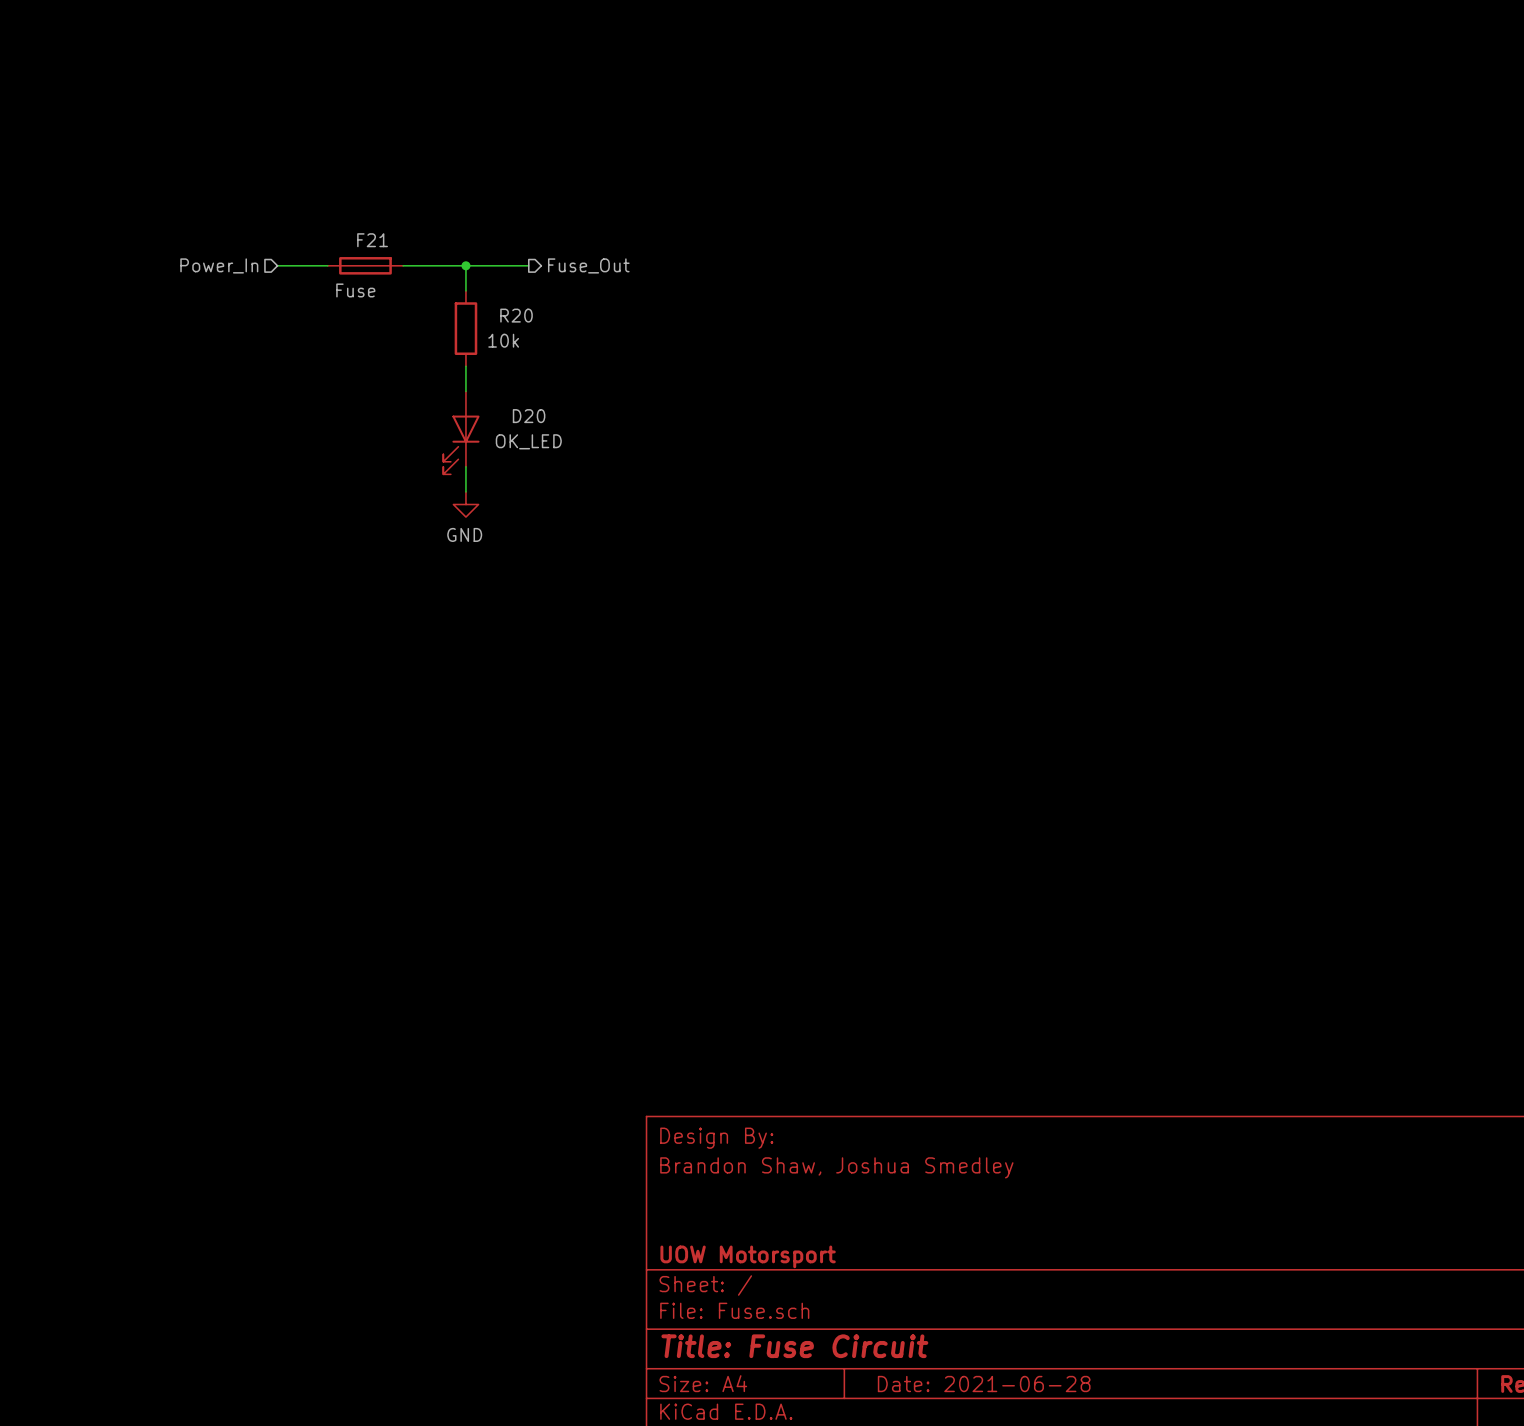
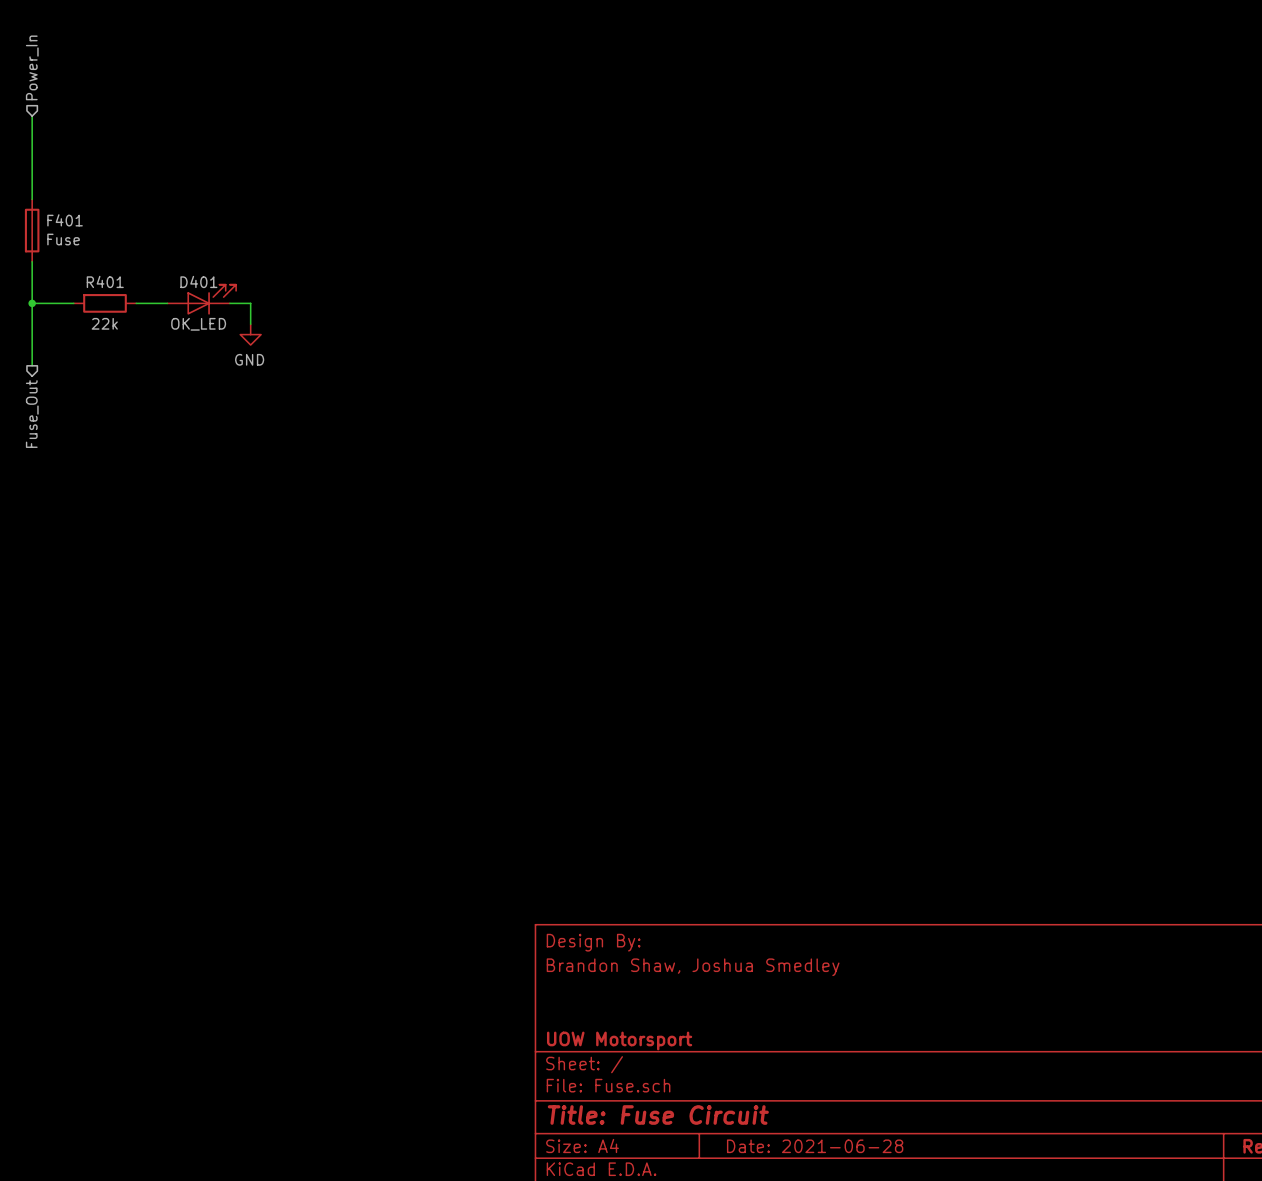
hierarchical label: none -> Power_In (32, 67)
wire: none -> (32, 116) (32, 199)
hierarchical label: Power_In (219, 265) -> none
wire: (277, 265) (327, 265) -> none
F21: Fuse (365, 265) -> none
wire: (403, 265) (528, 265) -> none
wire: (465, 265) (465, 290) -> none
junction: (465, 265) -> none
hierarchical label: Fuse_Out (588, 265) -> none
F401: none -> Fuse (32, 230)
wire: none -> (32, 261) (32, 365)
R20: 10k (465, 328) -> none
D401: none -> OK_LED (201, 299)
wire: none -> (32, 303) (73, 303)
junction: none -> (32, 303)
R401: none -> 22k (105, 303)
wire: none -> (136, 303) (167, 303)
wire: none -> (229, 303) (250, 303) (250, 324)
wire: (465, 366) (465, 391) -> none
D20: OK_LED (461, 432) -> none
wire: (465, 466) (465, 491) -> none
hierarchical label: none -> Fuse_Out (32, 414)
power symbol position: GND (465, 504) -> GND (250, 334)

